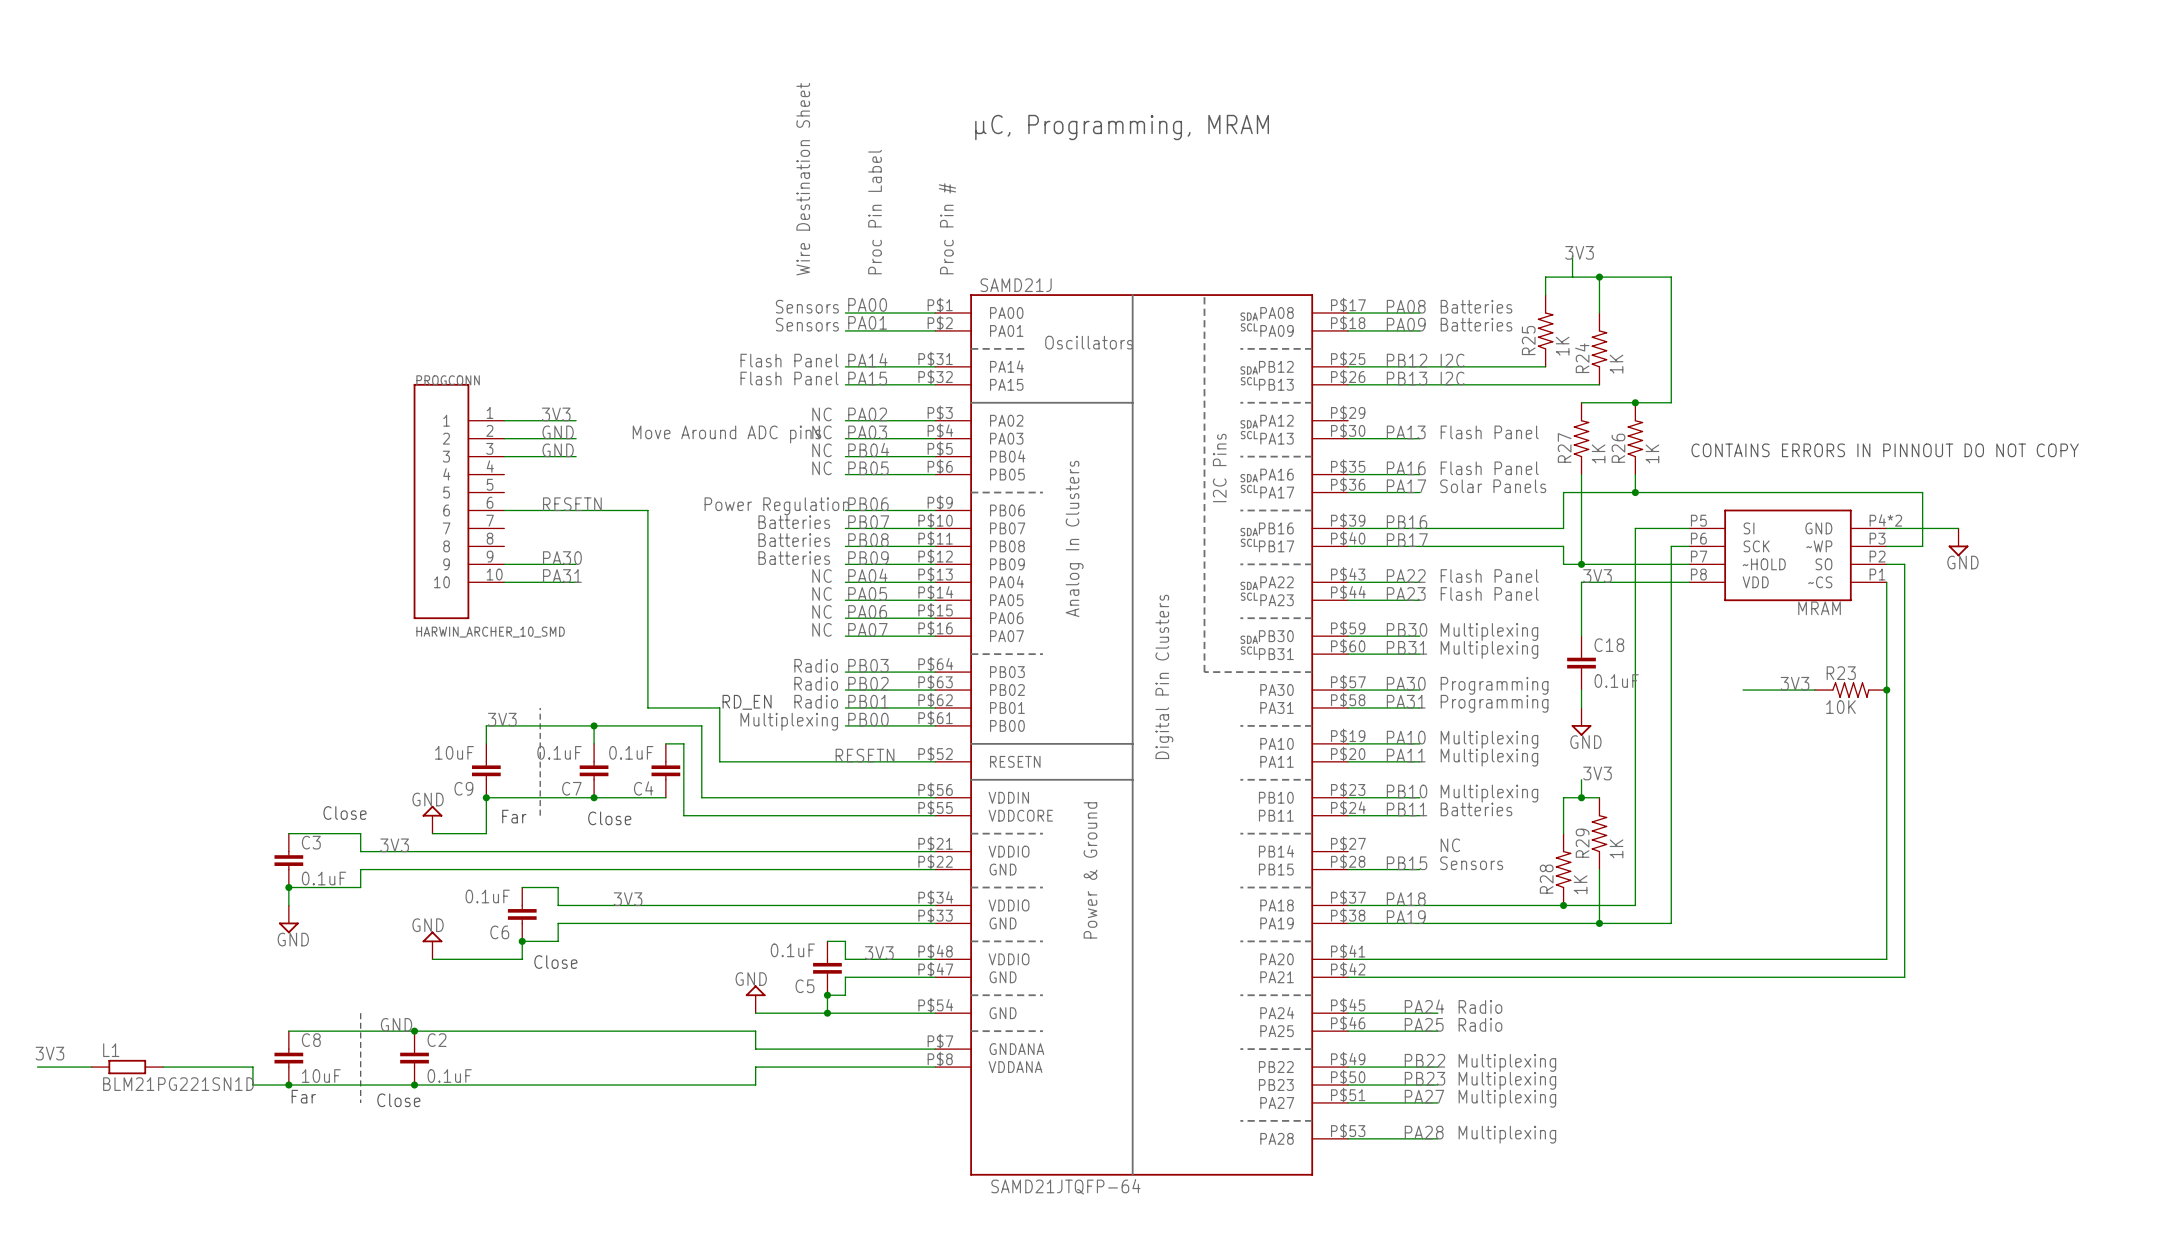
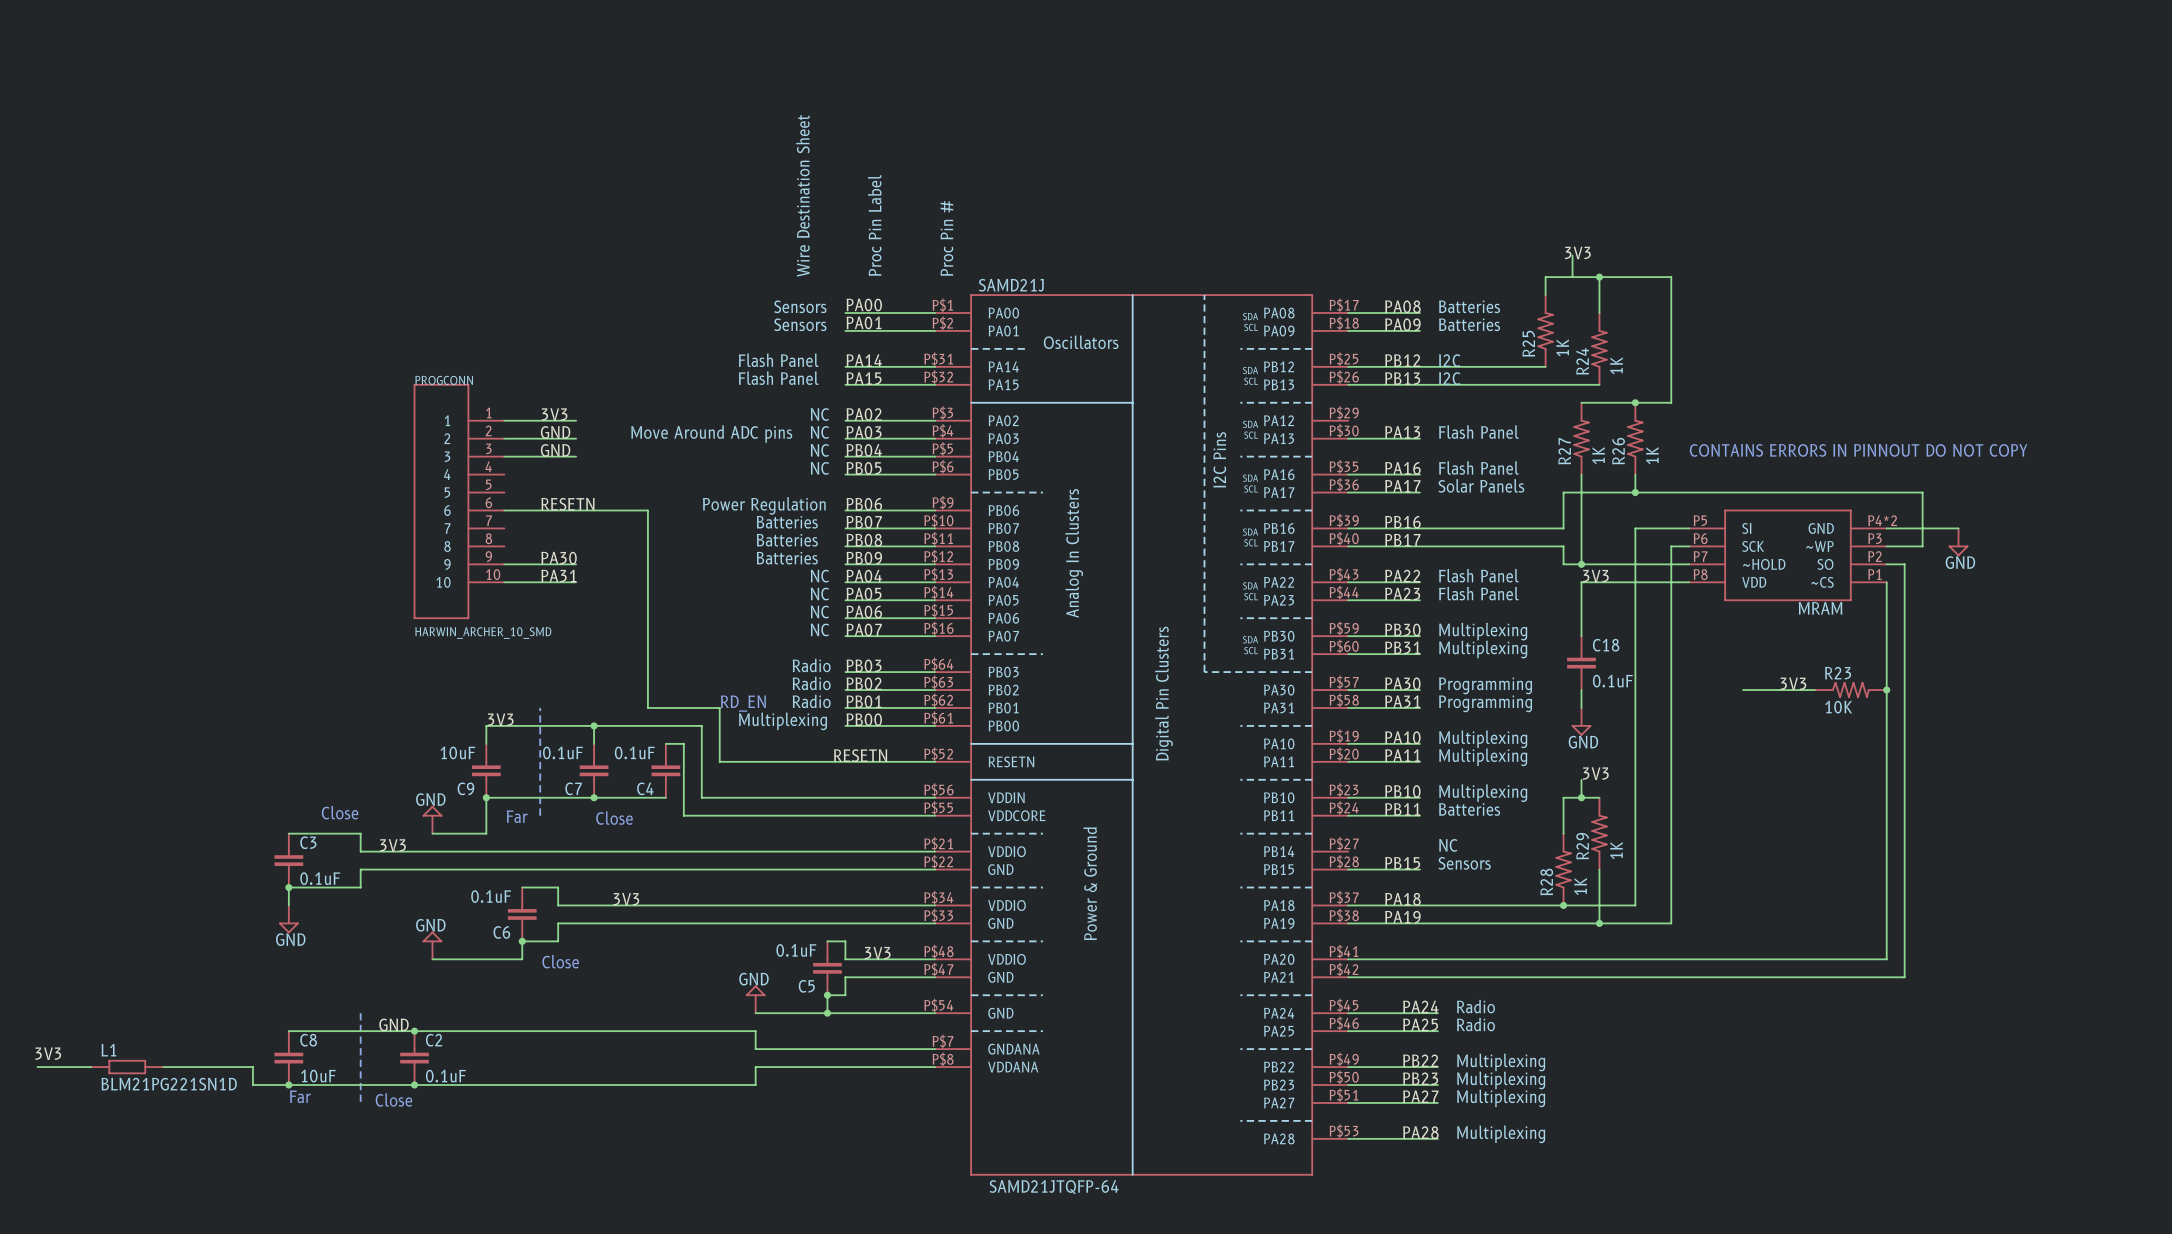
text: µC, Programming, MRAM (1122, 127) -> none

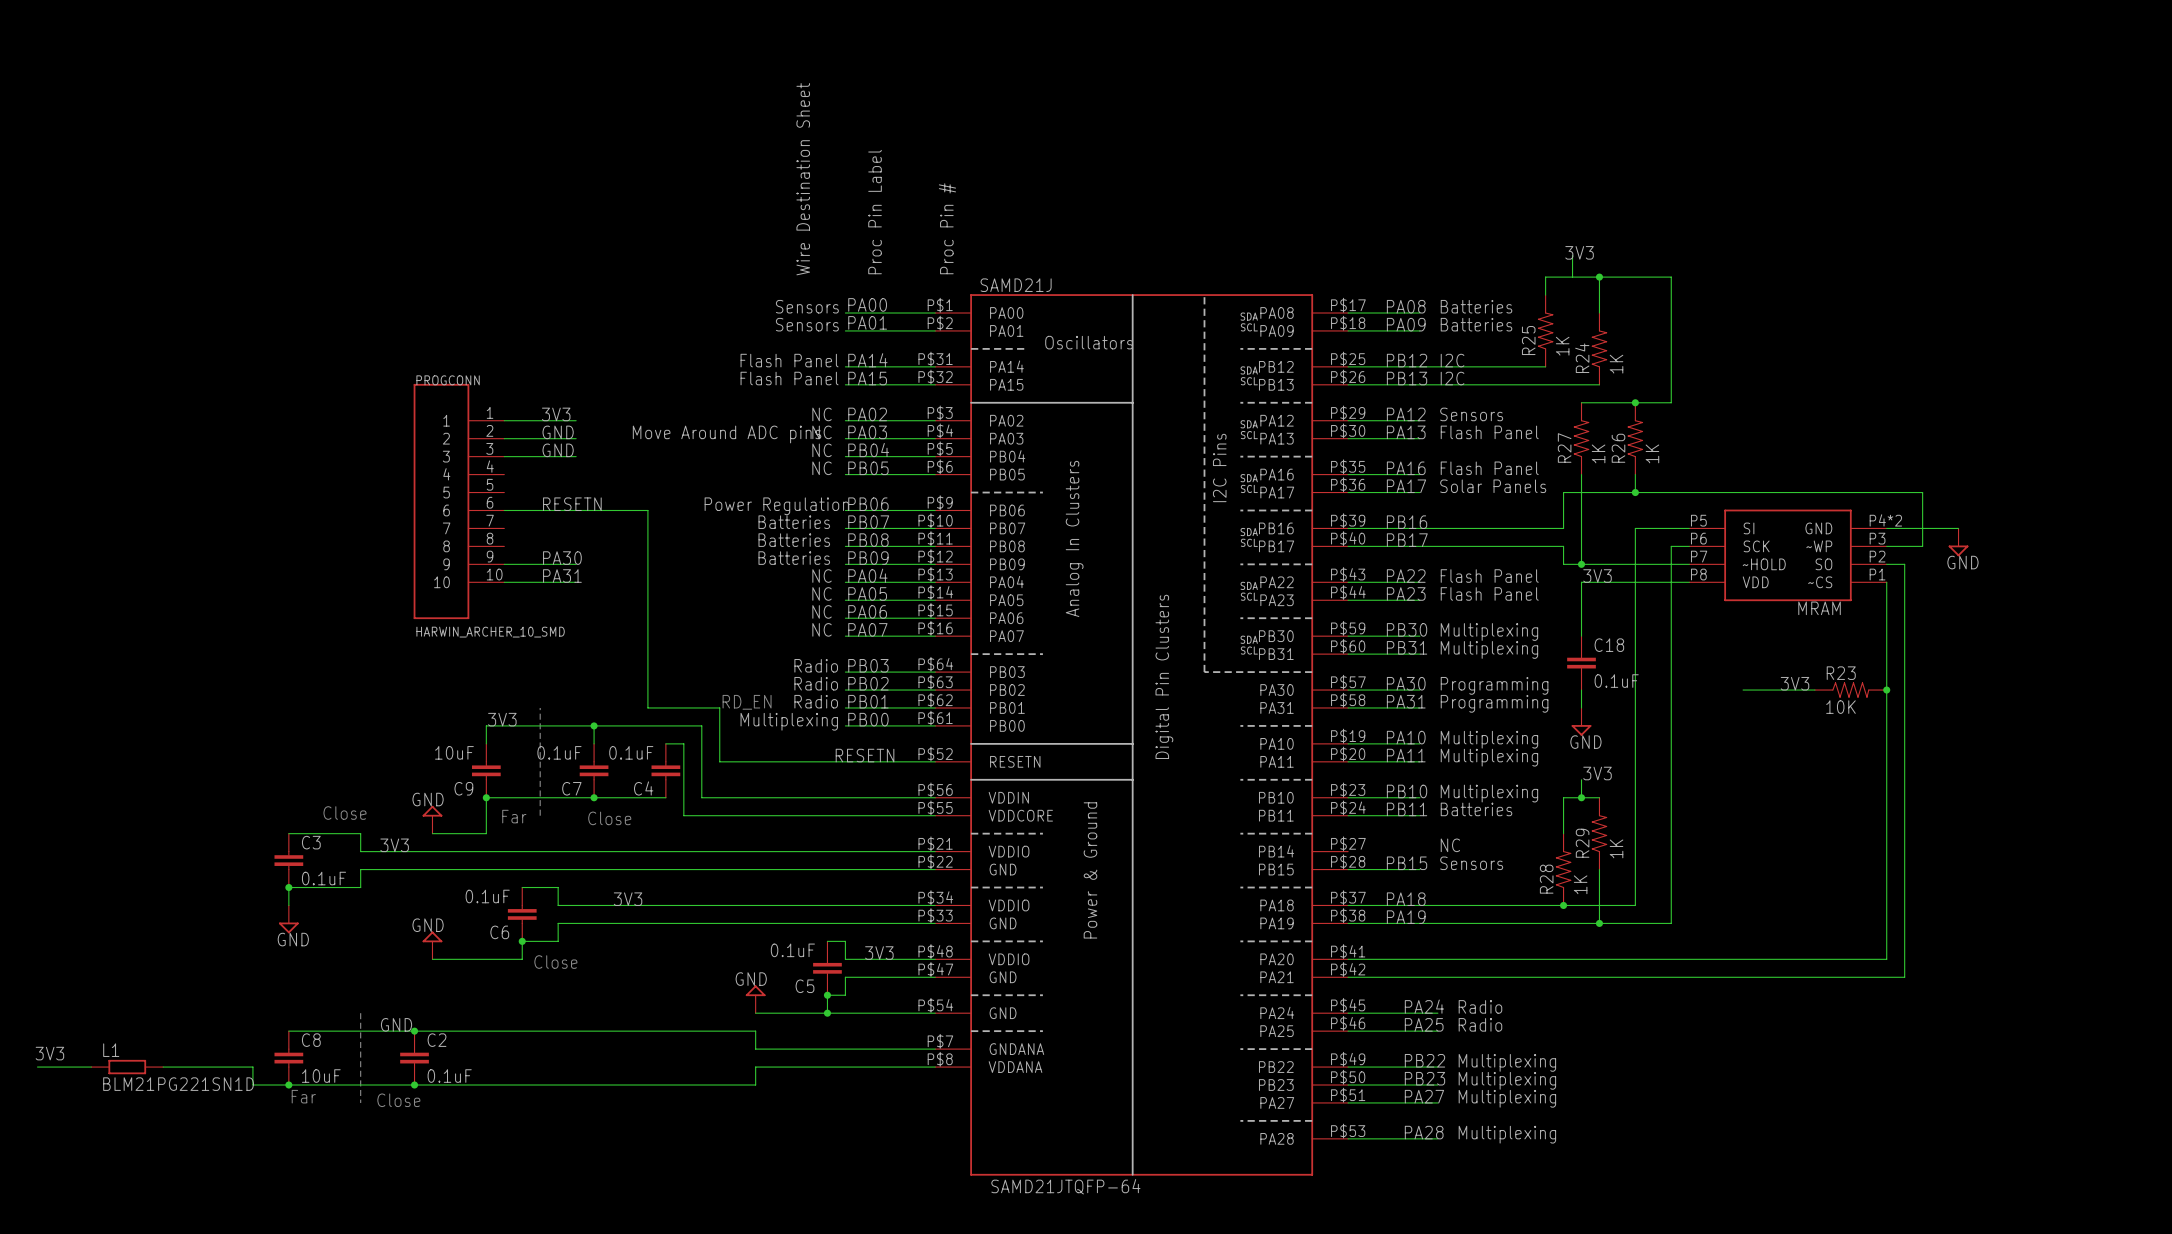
label: none -> PA12 (1406, 414)
text: none -> Sensors (1471, 414)
wire: none -> (1348, 420) (1419, 420)
text: CONTAINS ERRORS IN PINNOUT DO NOT COPY (1858, 450) -> none

